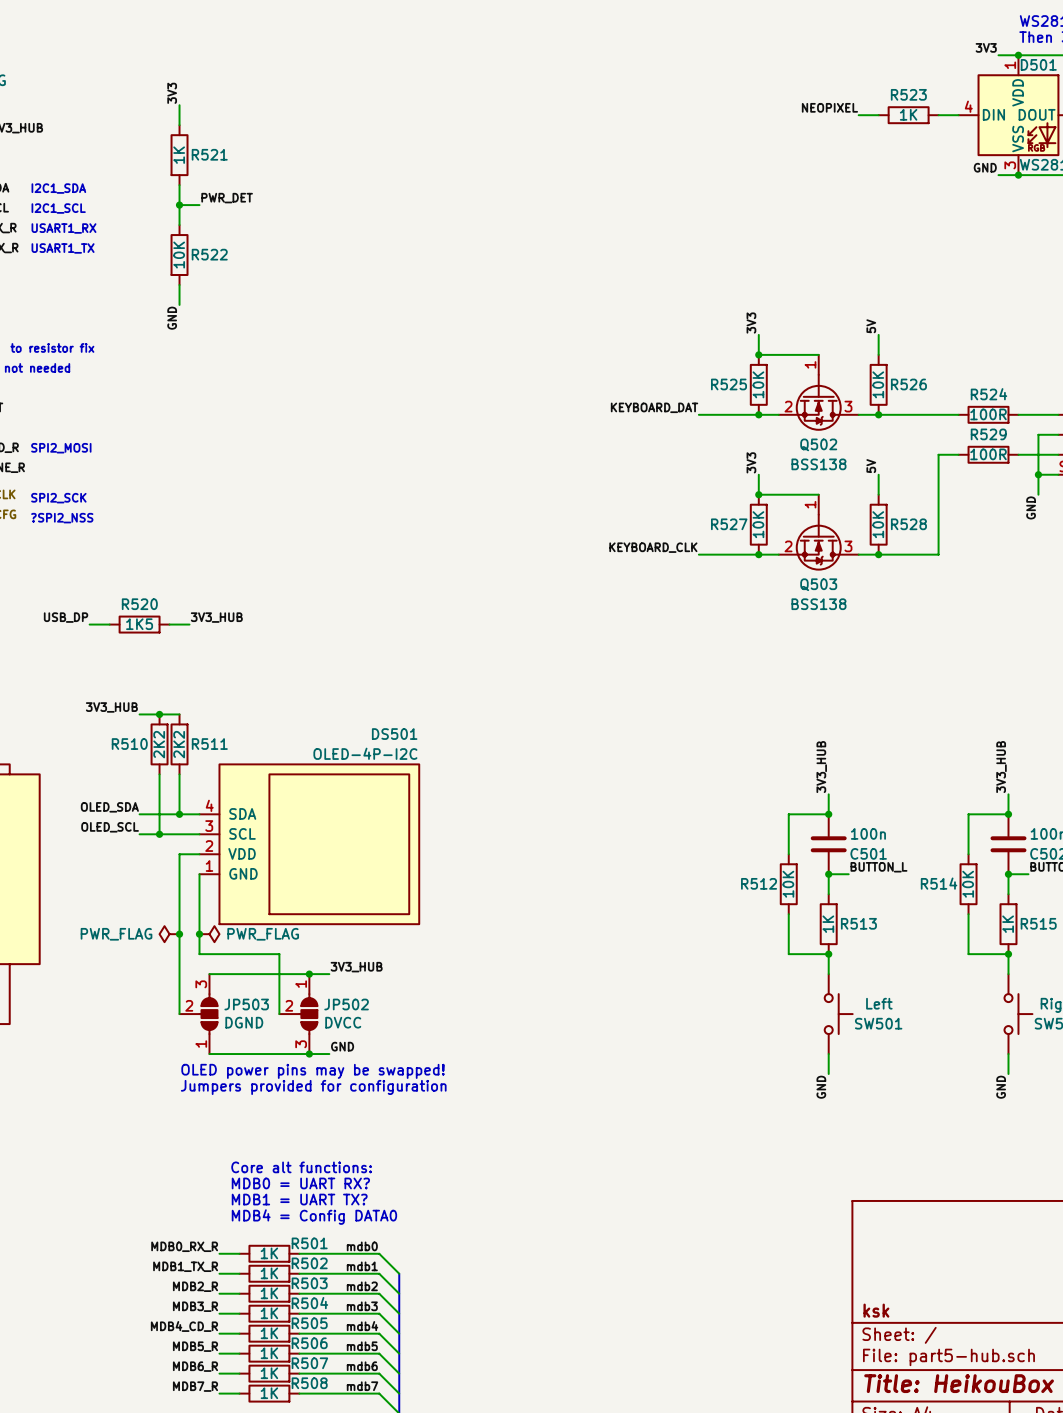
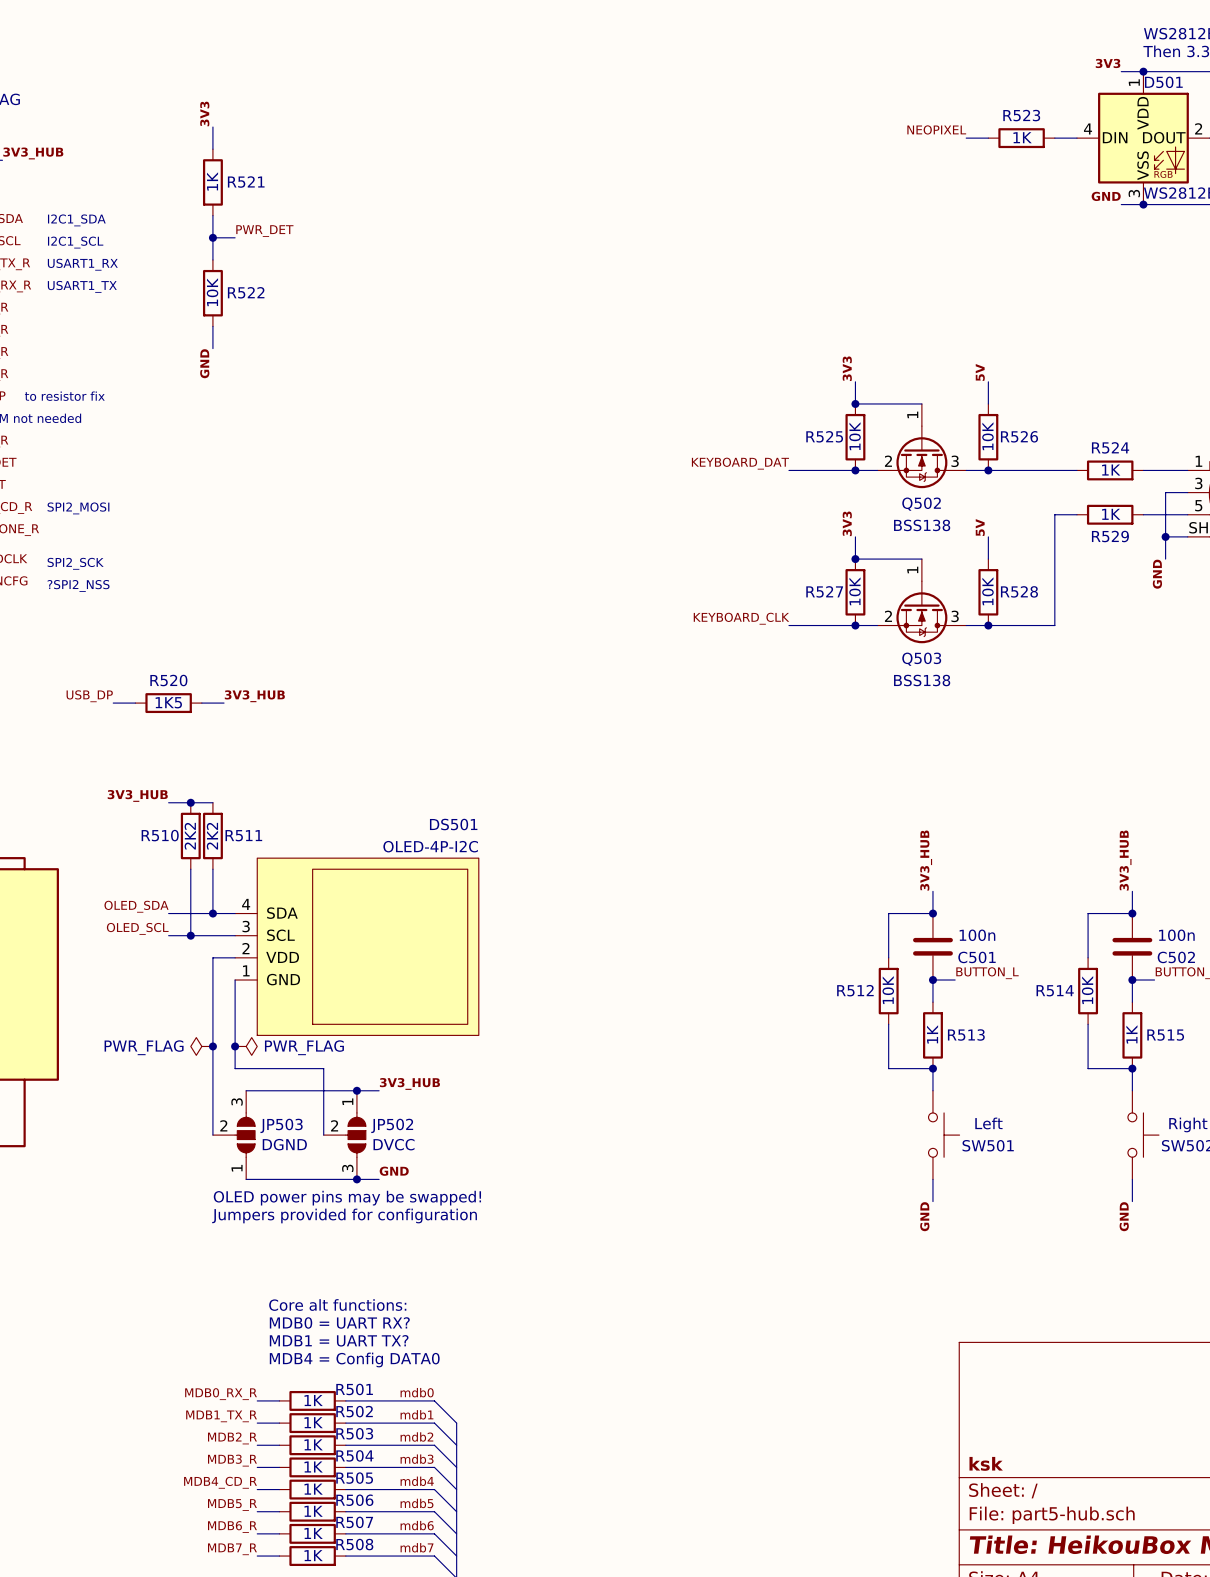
R524 value: 100R (988, 414) -> 1K (1111, 470)
R529 name position: R529 (988, 434) -> R529 (1110, 536)
R529 value: 100R (988, 454) -> 1K (1111, 514)

